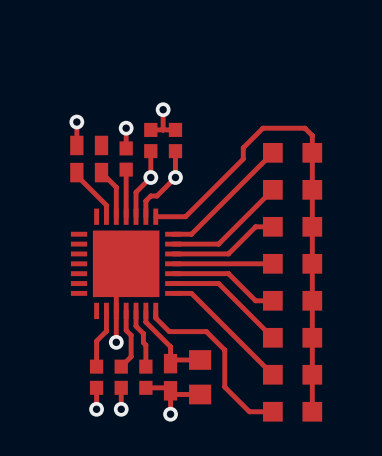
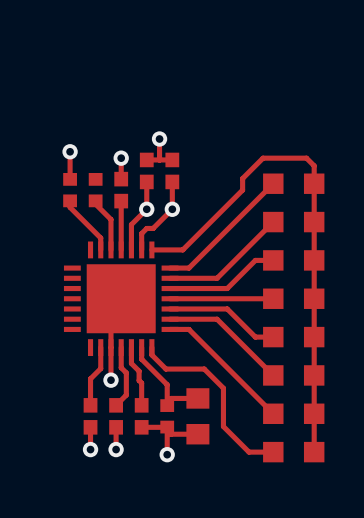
part footprint: [70, 135, 84, 183] -> [63, 172, 77, 208]
part footprint: [94, 135, 109, 183] -> [88, 172, 103, 208]
part footprint: [163, 353, 178, 401] -> [160, 399, 175, 434]

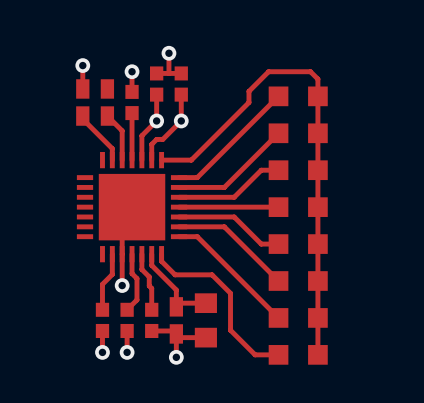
part footprint: [63, 172, 77, 208] -> [76, 79, 90, 126]
part footprint: [88, 172, 103, 208] -> [100, 79, 115, 126]
part footprint: [160, 399, 175, 434] -> [169, 297, 183, 344]

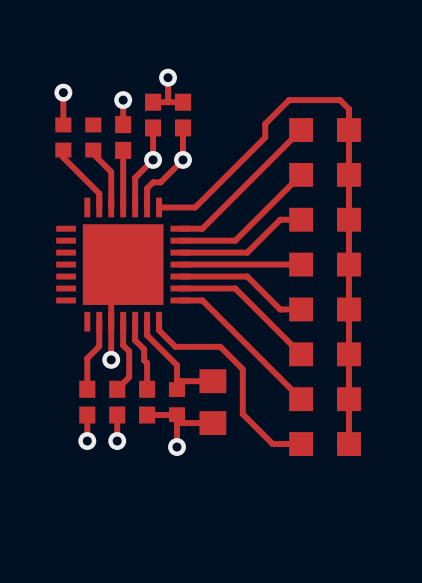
part footprint: [76, 79, 90, 126] -> [55, 117, 72, 158]
part footprint: [100, 79, 115, 126] -> [85, 117, 102, 158]
part footprint: [169, 297, 183, 344] -> [168, 382, 186, 423]

